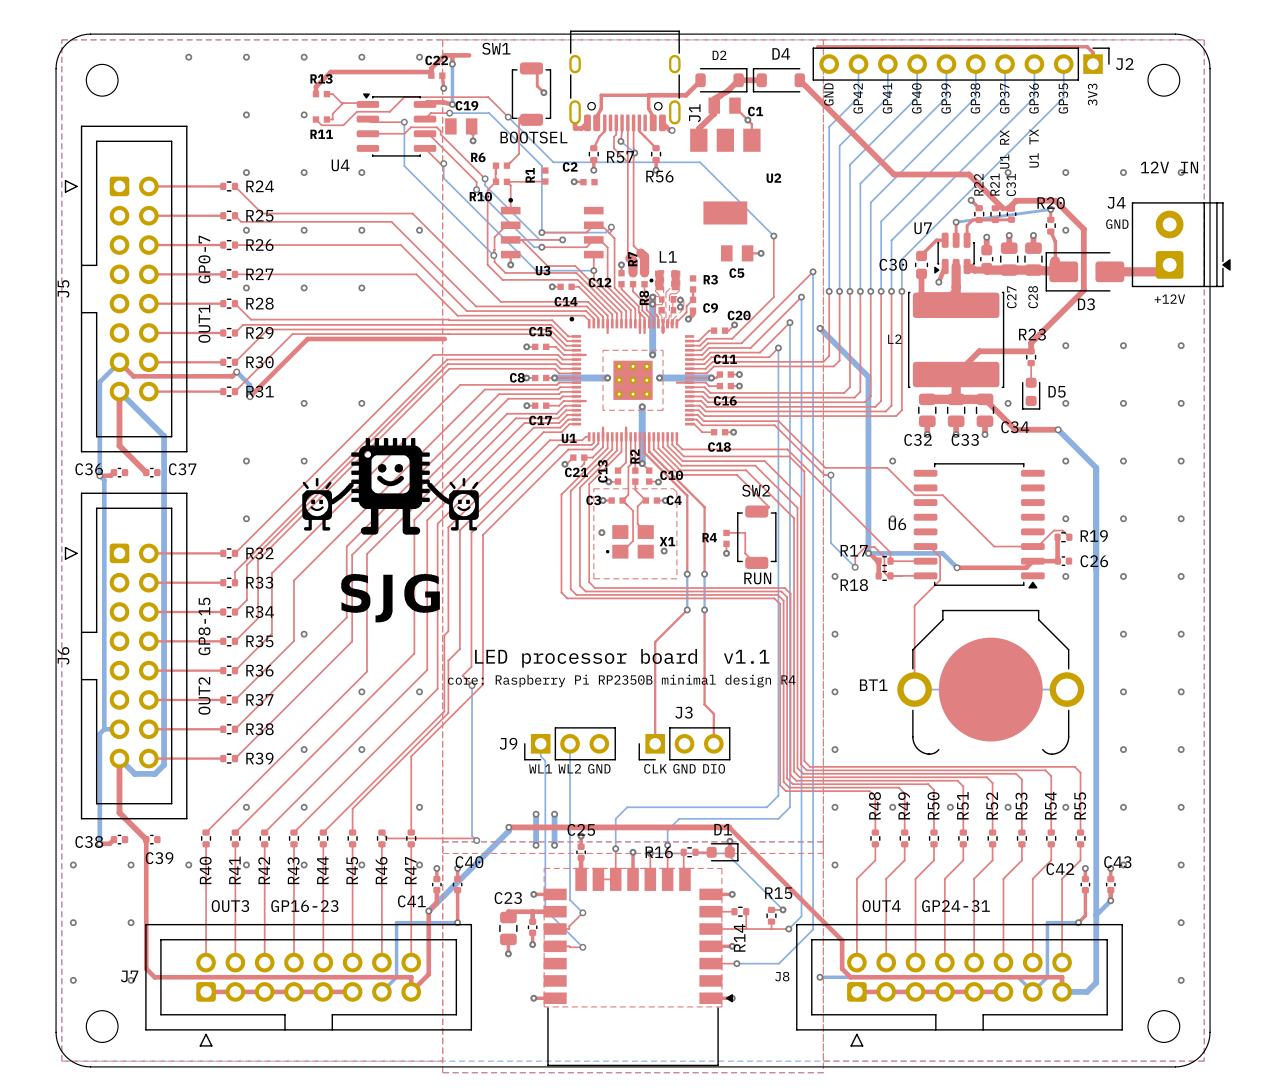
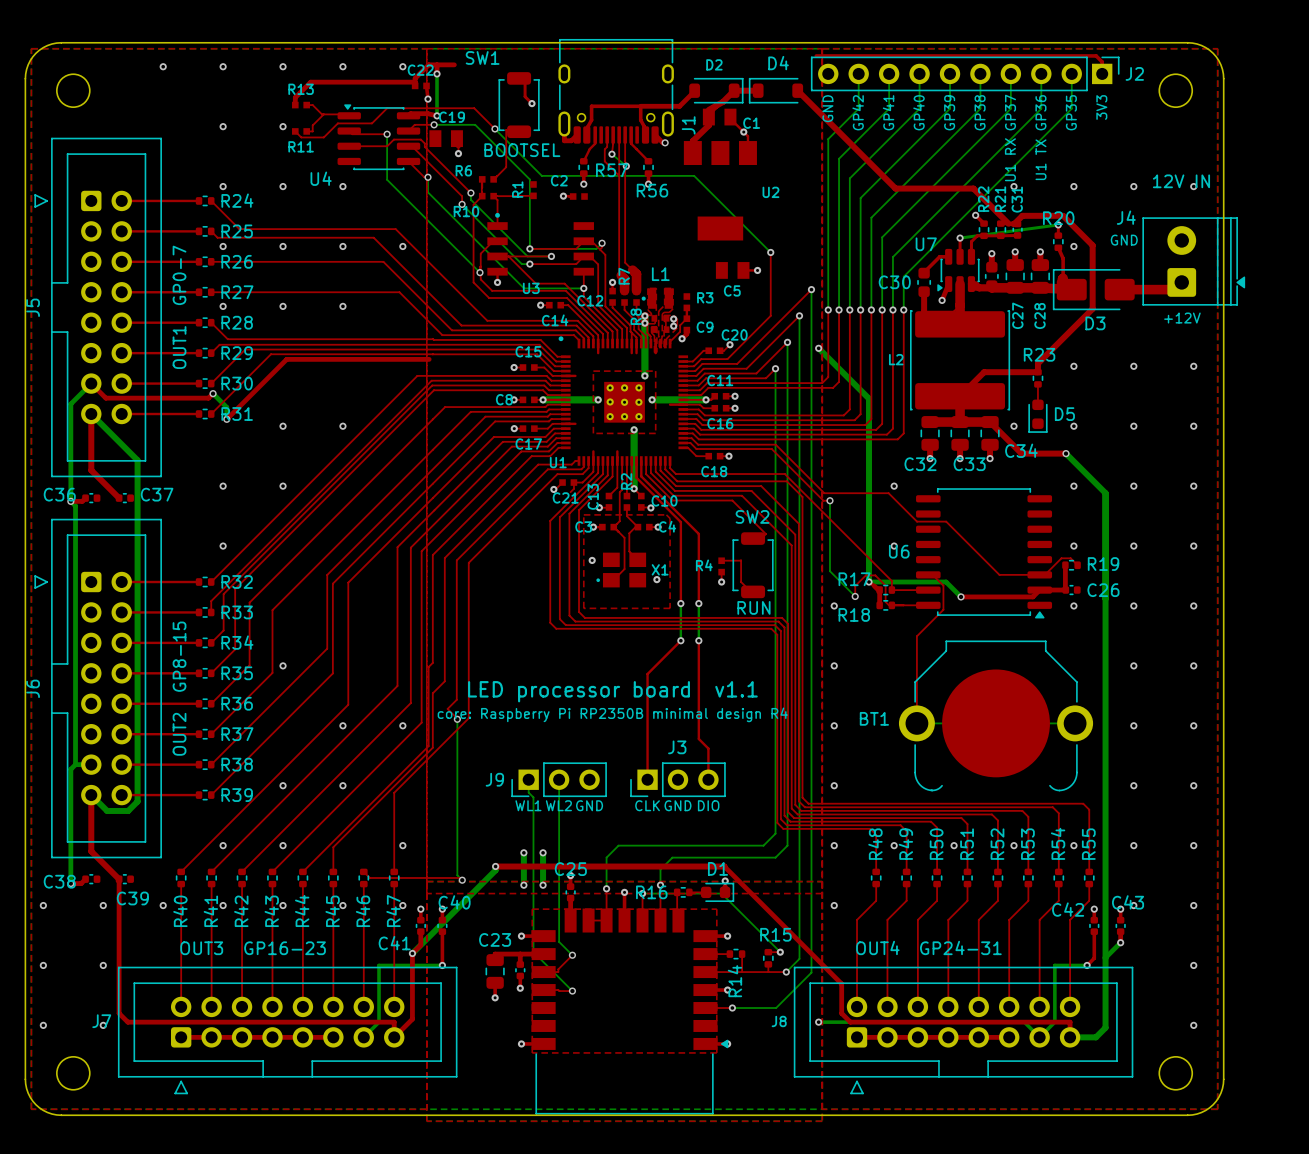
drawing: [302, 438, 479, 623] -> none

